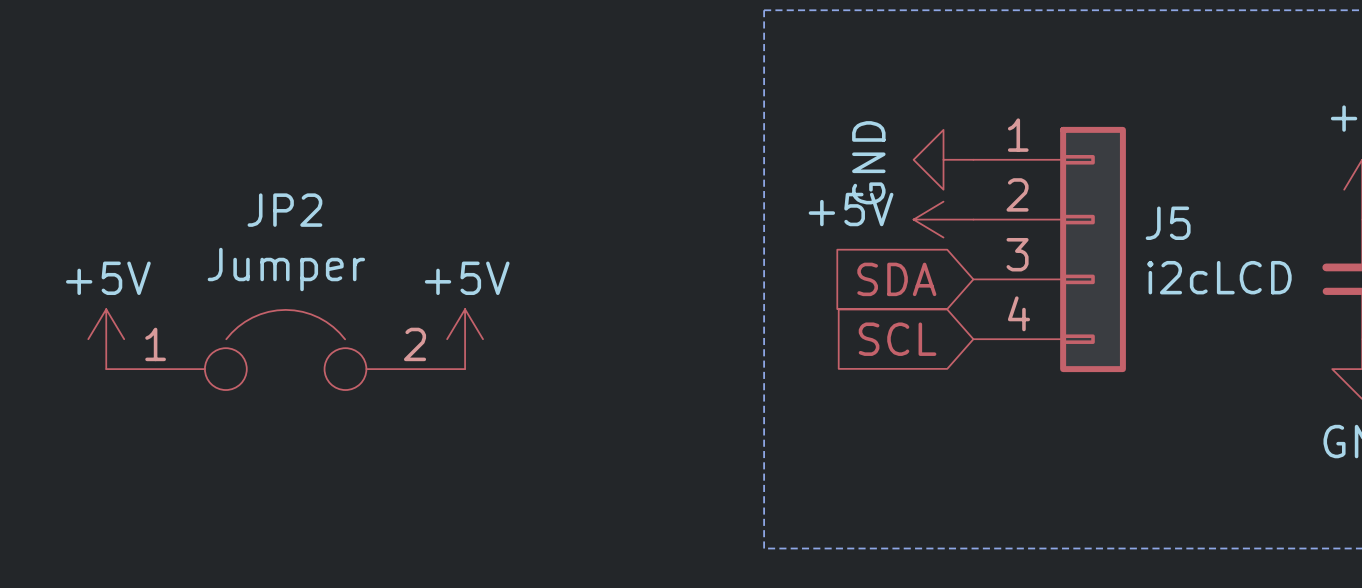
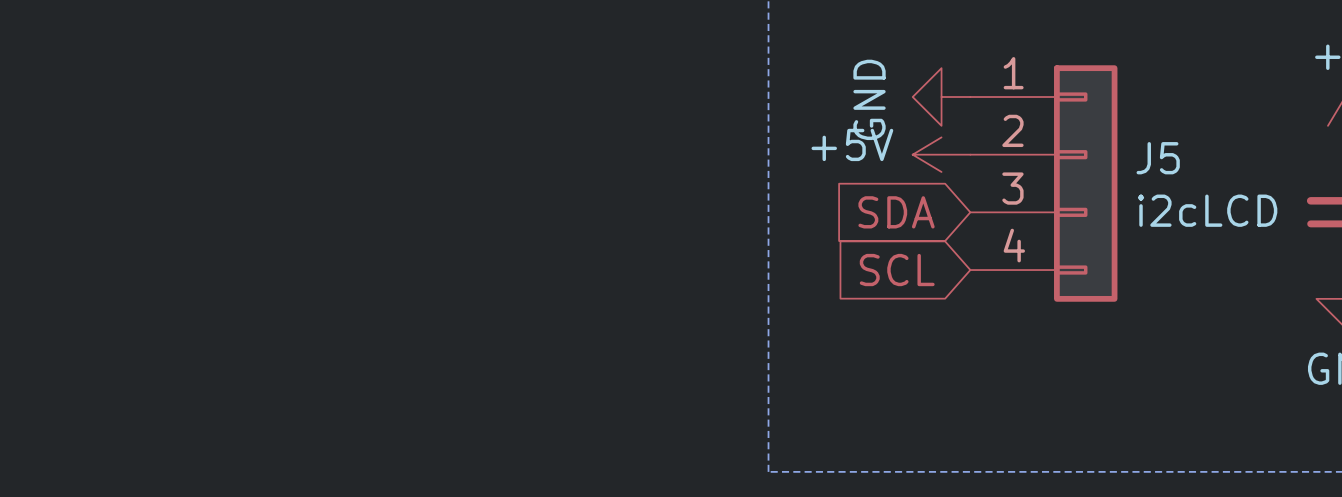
power symbol: +5V (106, 339) -> none
power symbol: +5V (465, 339) -> none
JP2: Jumper (285, 349) -> none

